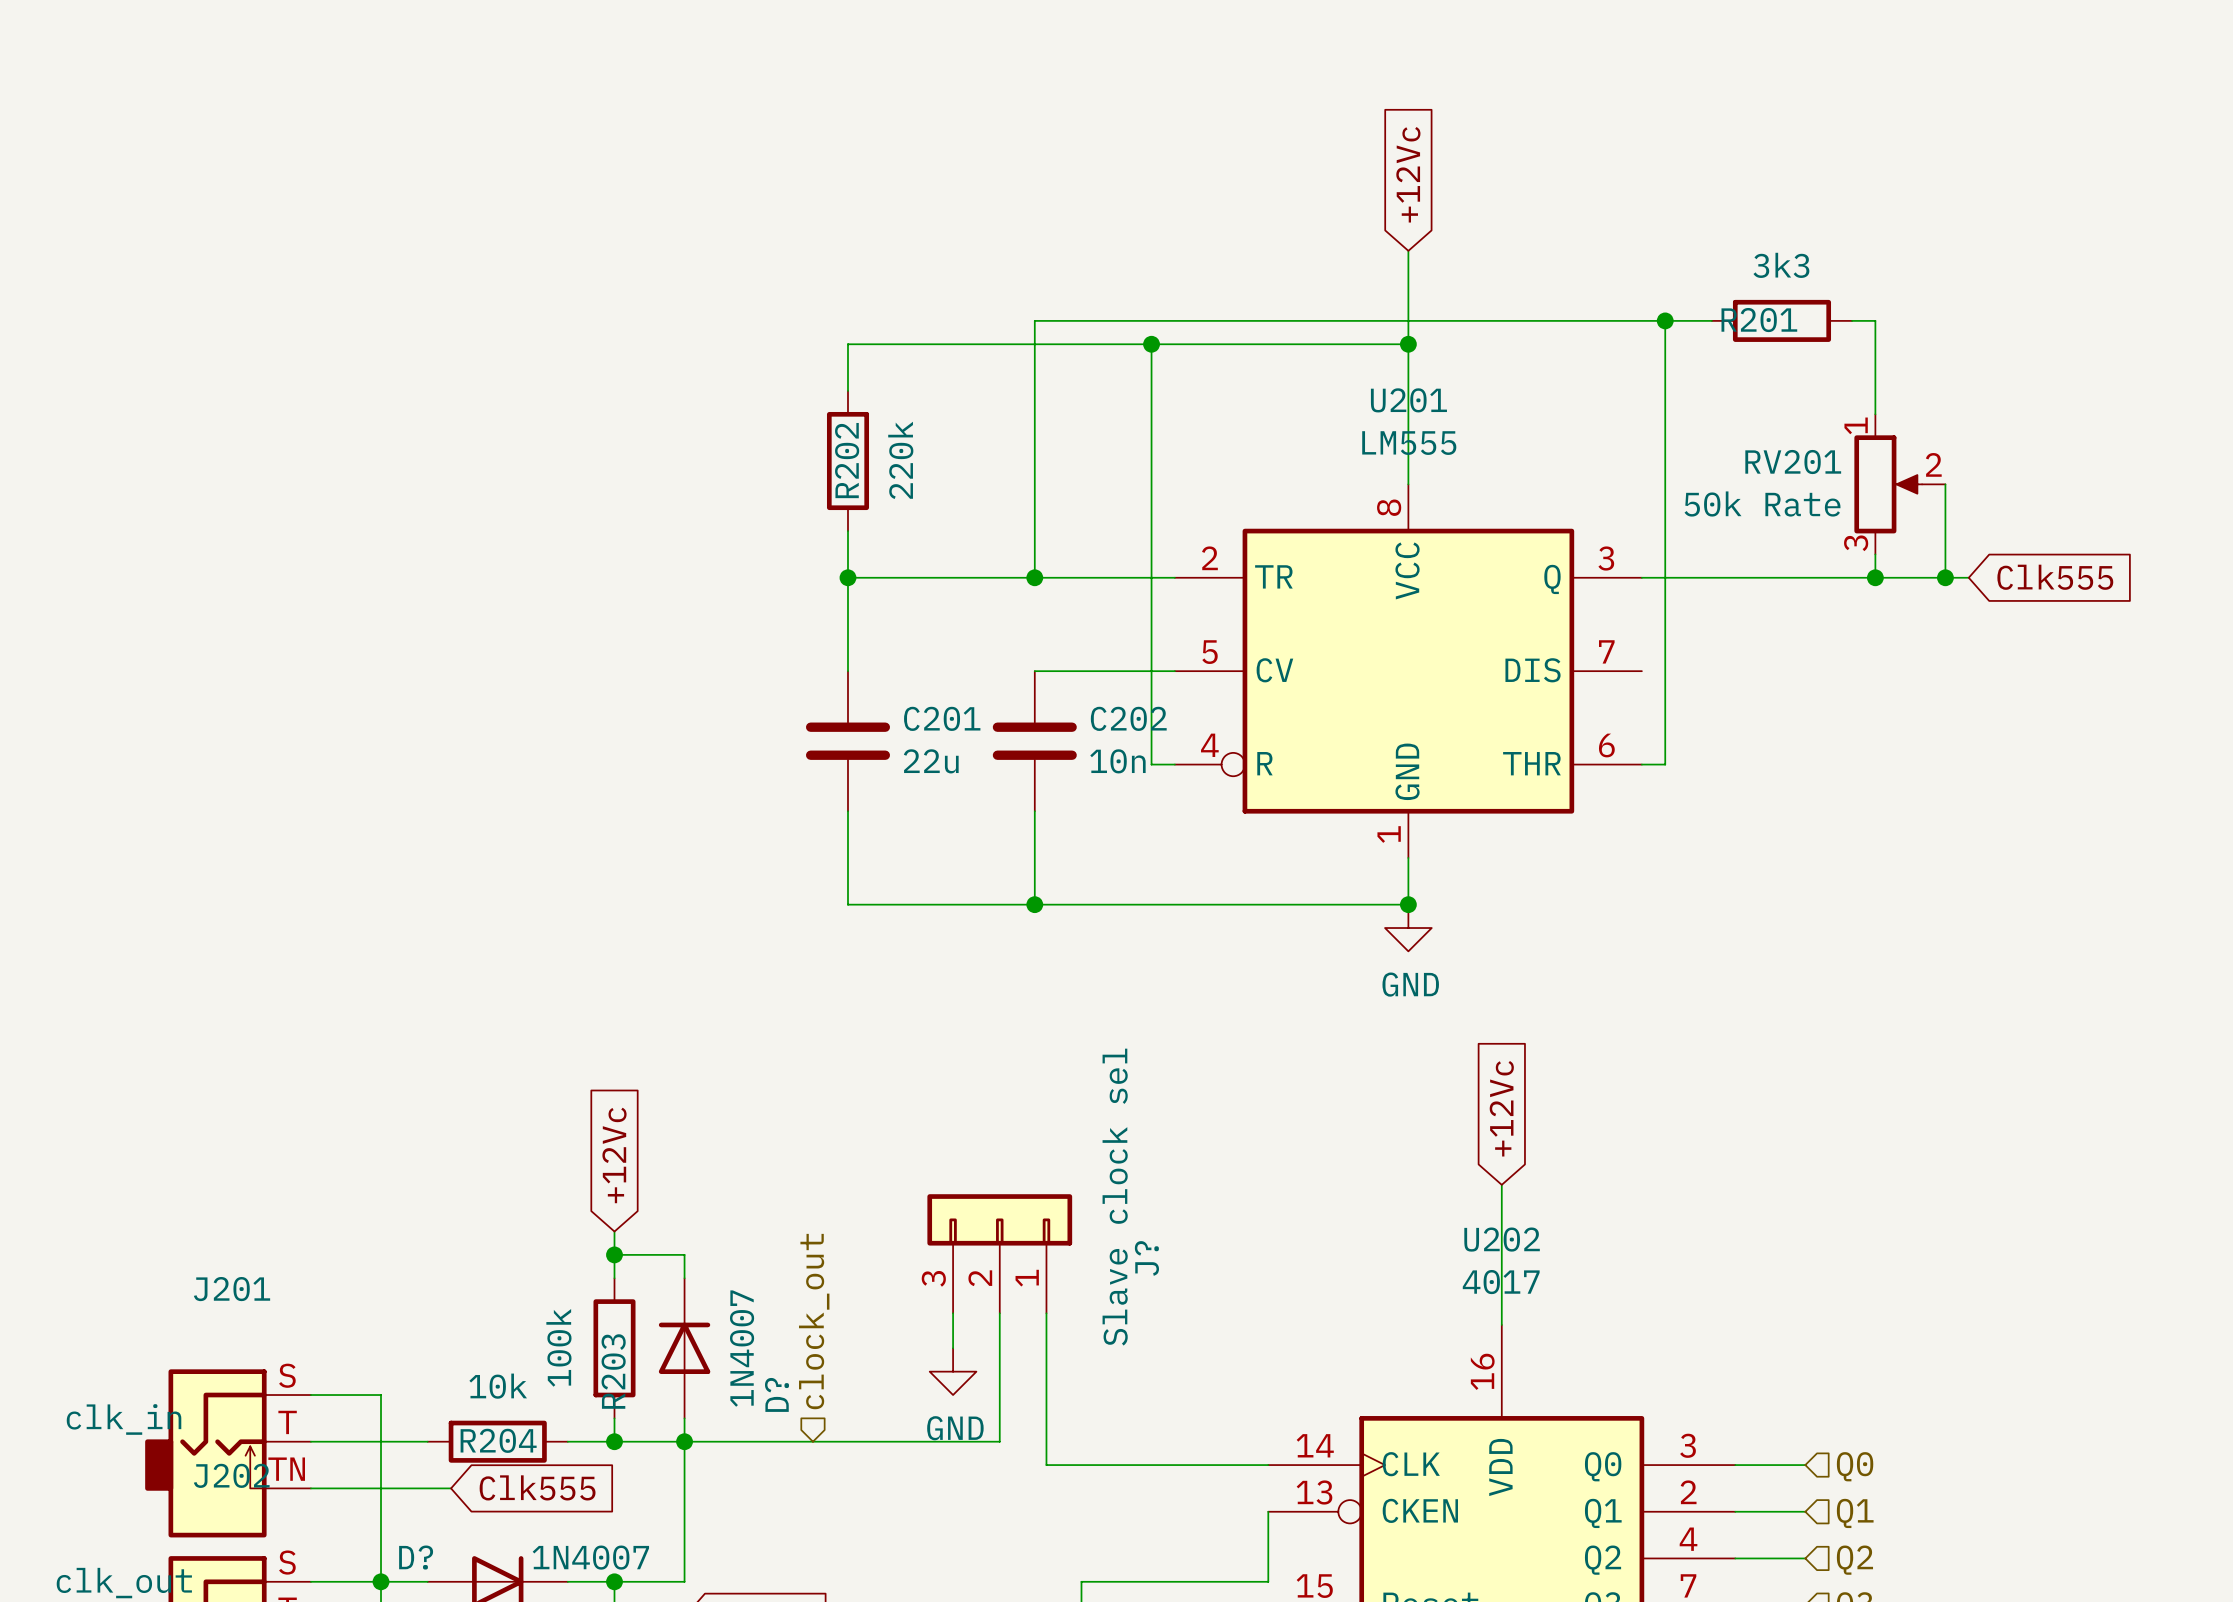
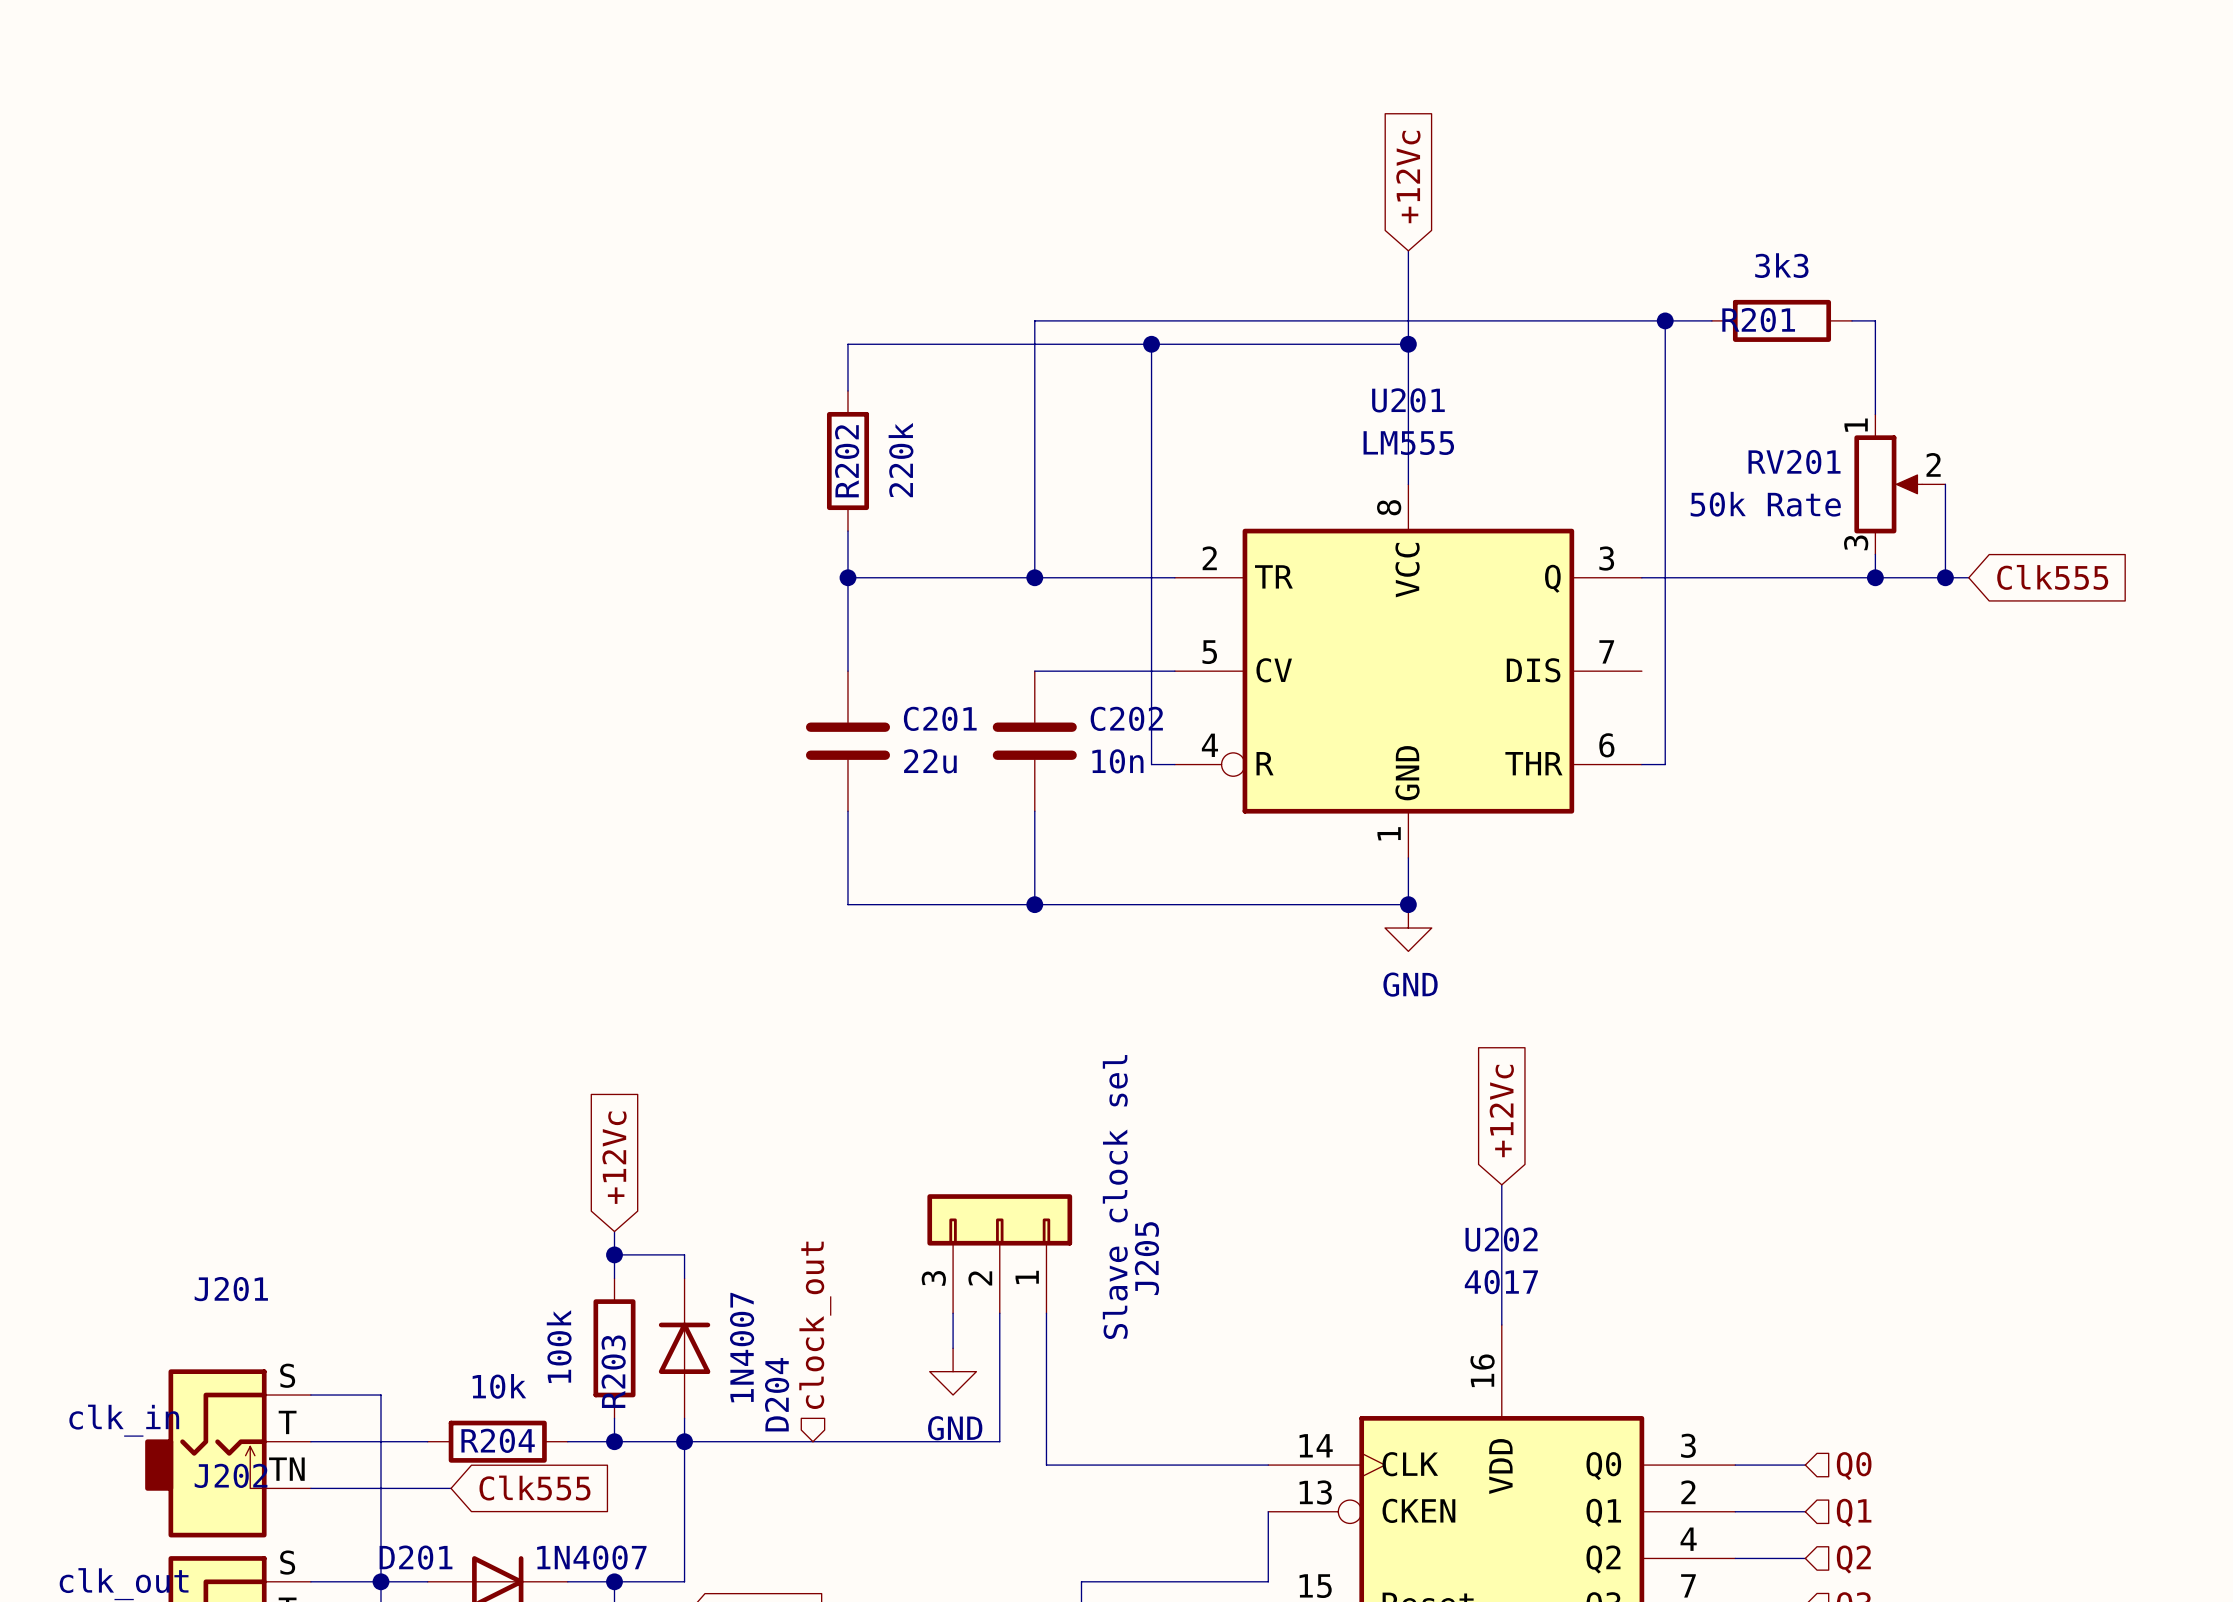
J? name: J? (1146, 1258) -> J205 (1146, 1258)
D? name: D? (777, 1394) -> D204 (777, 1394)
D? name: D? (416, 1557) -> D201 (416, 1557)

